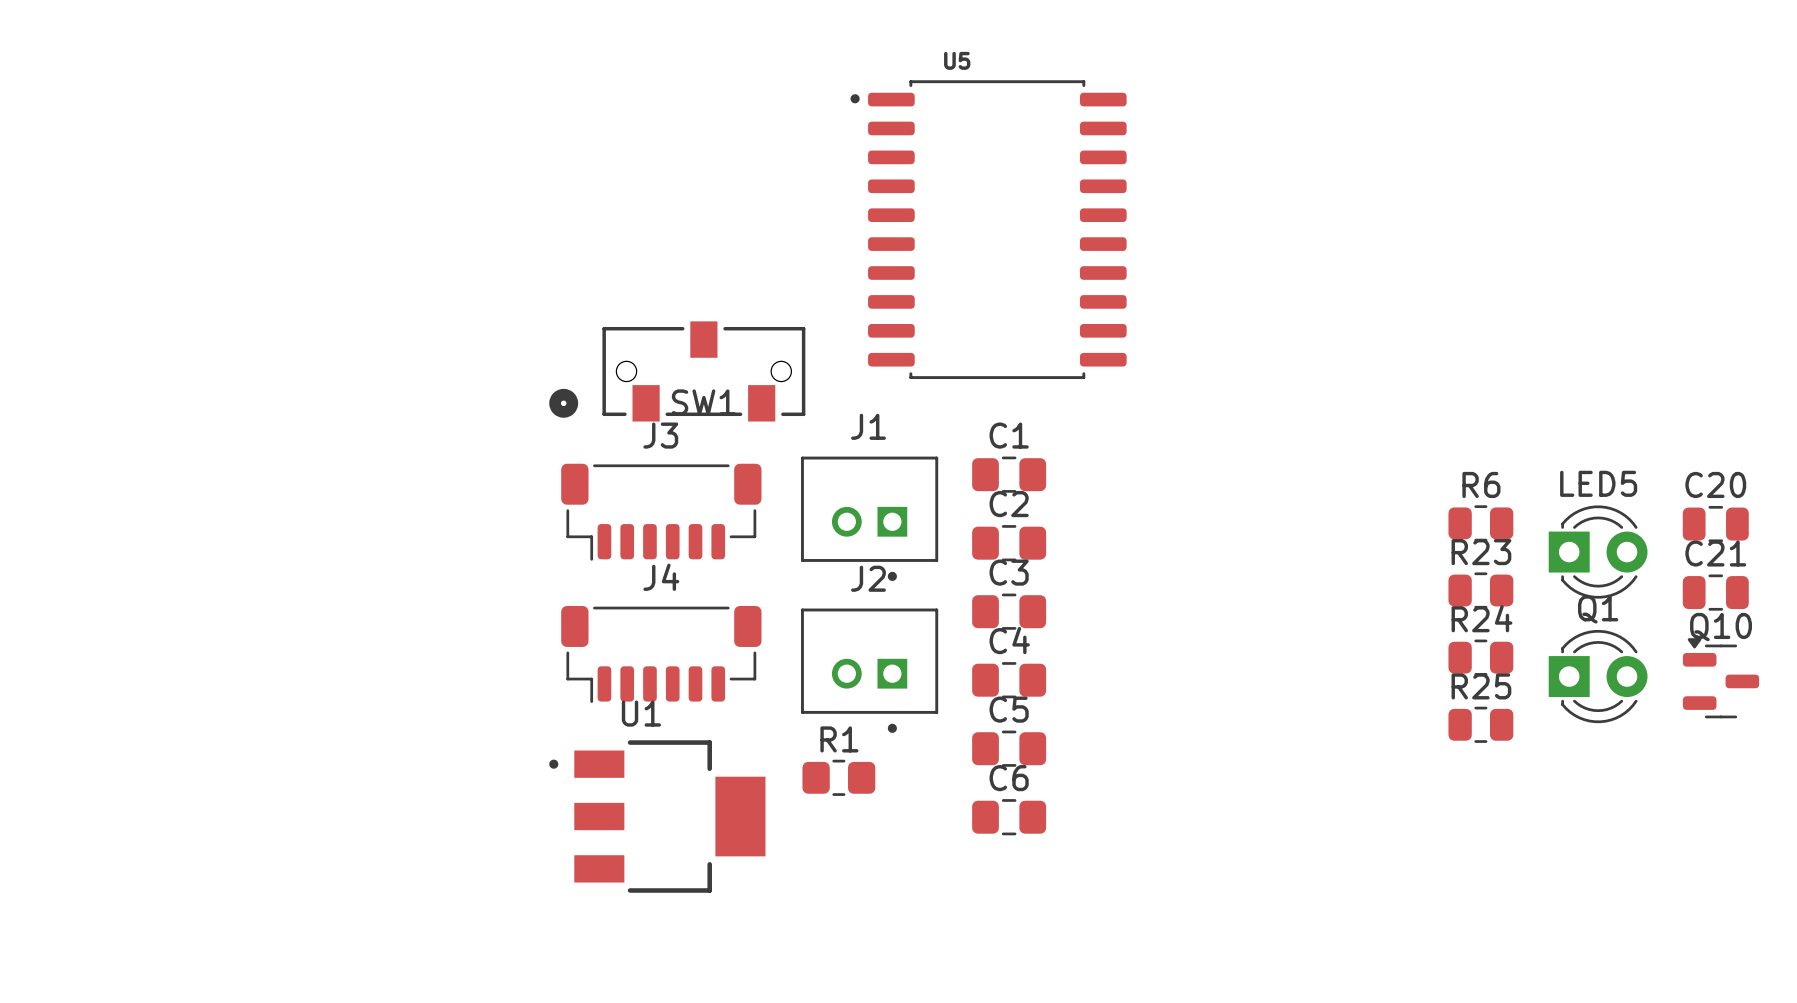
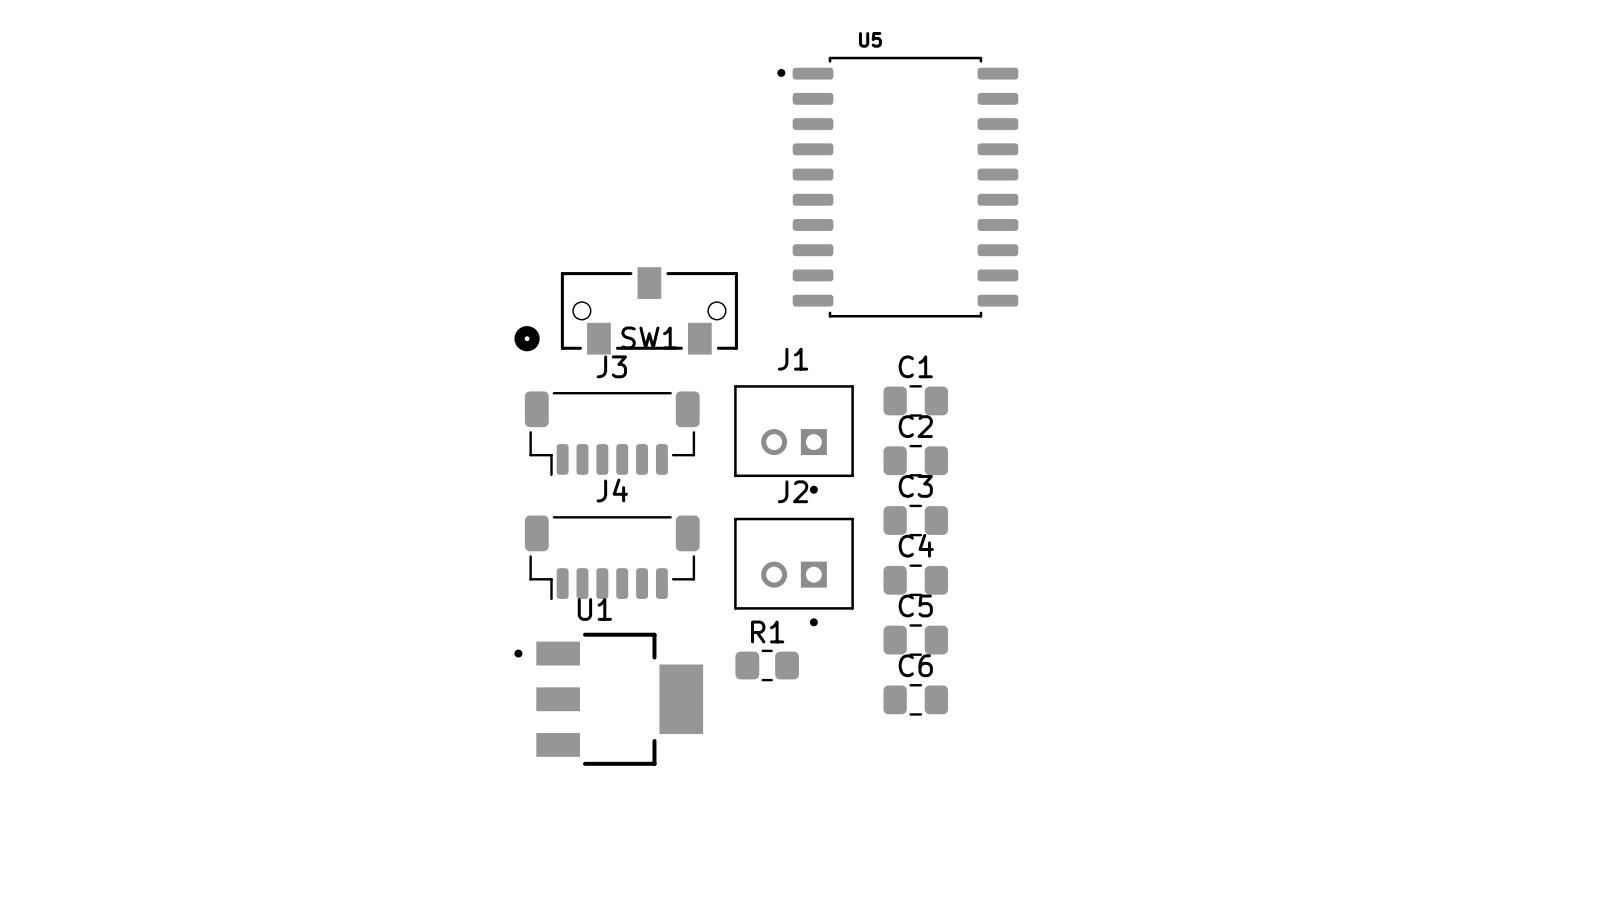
R6: (1480, 523) -> none
C20: (1715, 524) -> none
LED5: (1598, 552) -> none
R23: (1480, 590) -> none
C21: (1715, 592) -> none
R24: (1480, 657) -> none
Q1: (1598, 676) -> none
Q10: (1721, 678) -> none
R25: (1480, 724) -> none

